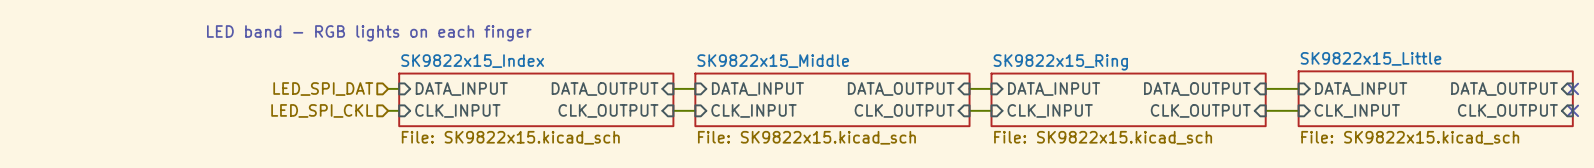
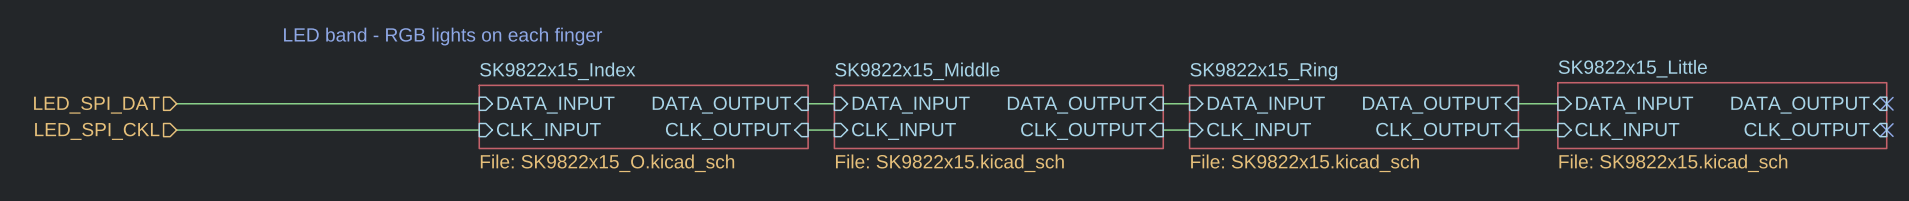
wire: none -> (176, 103) (466, 103)
hierarchical label: none -> LED_SPI_DAT (96, 105)
hierarchical label: LED_SPI_DAT (323, 89) -> none
hierarchical label: none -> LED_SPI_CKL (97, 131)
wire: none -> (176, 130) (466, 130)
hierarchical label: LED_SPI_CKL (322, 110) -> none
sheet SK9822x15_Index value: File: SK9822x15.kicad_sch (510, 137) -> File: SK9822x15_O.kicad_sch (607, 163)

